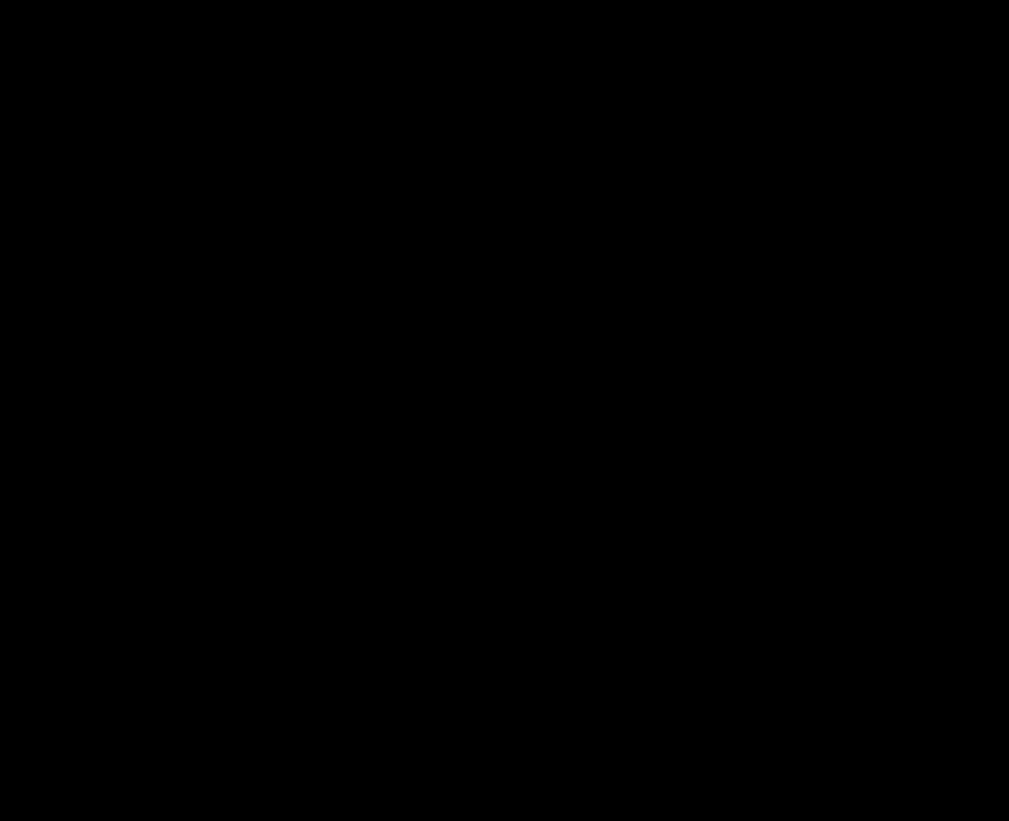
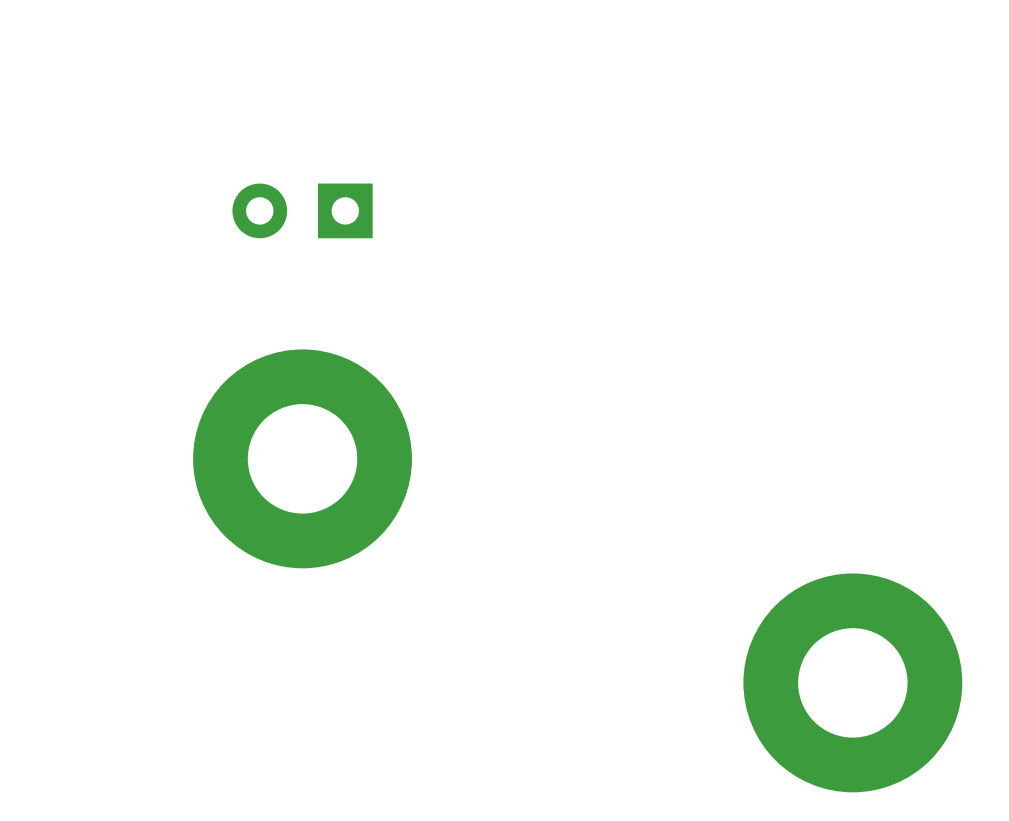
part: none -> (302, 210)
part: none -> (302, 458)
part: none -> (852, 682)

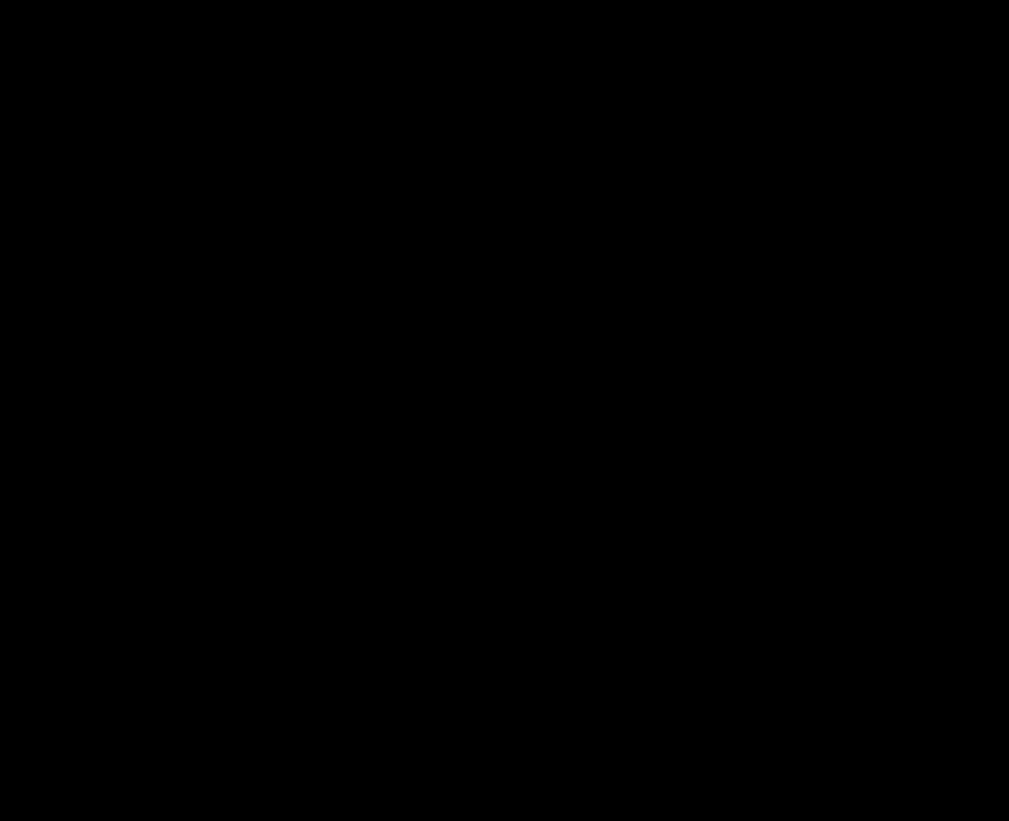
part: (302, 210) -> none
part: (302, 458) -> none
part: (852, 682) -> none

